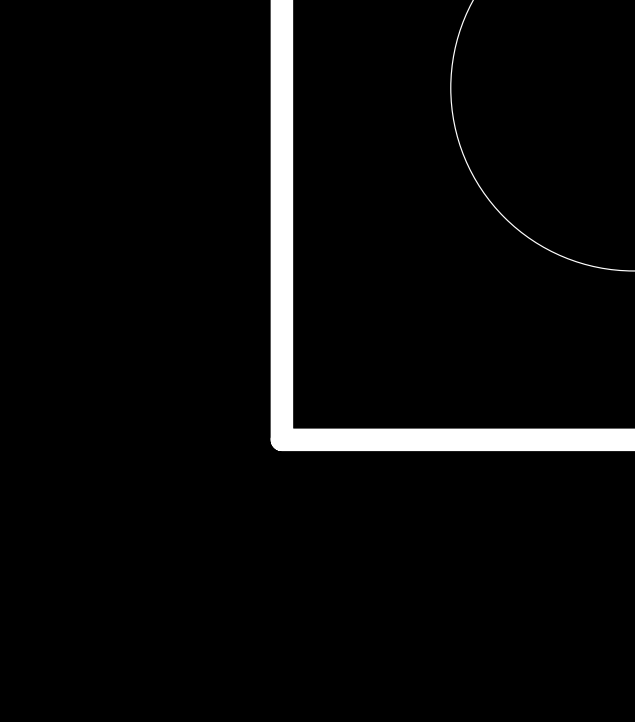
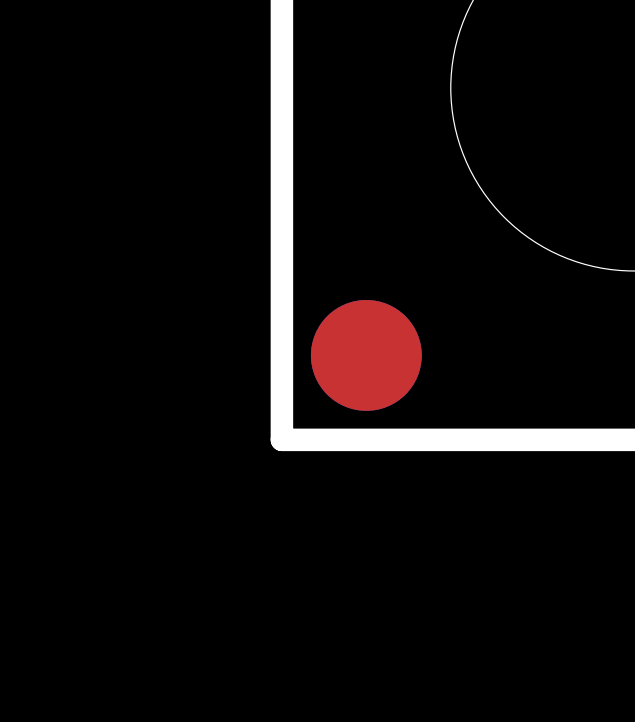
part: none -> (366, 355)

